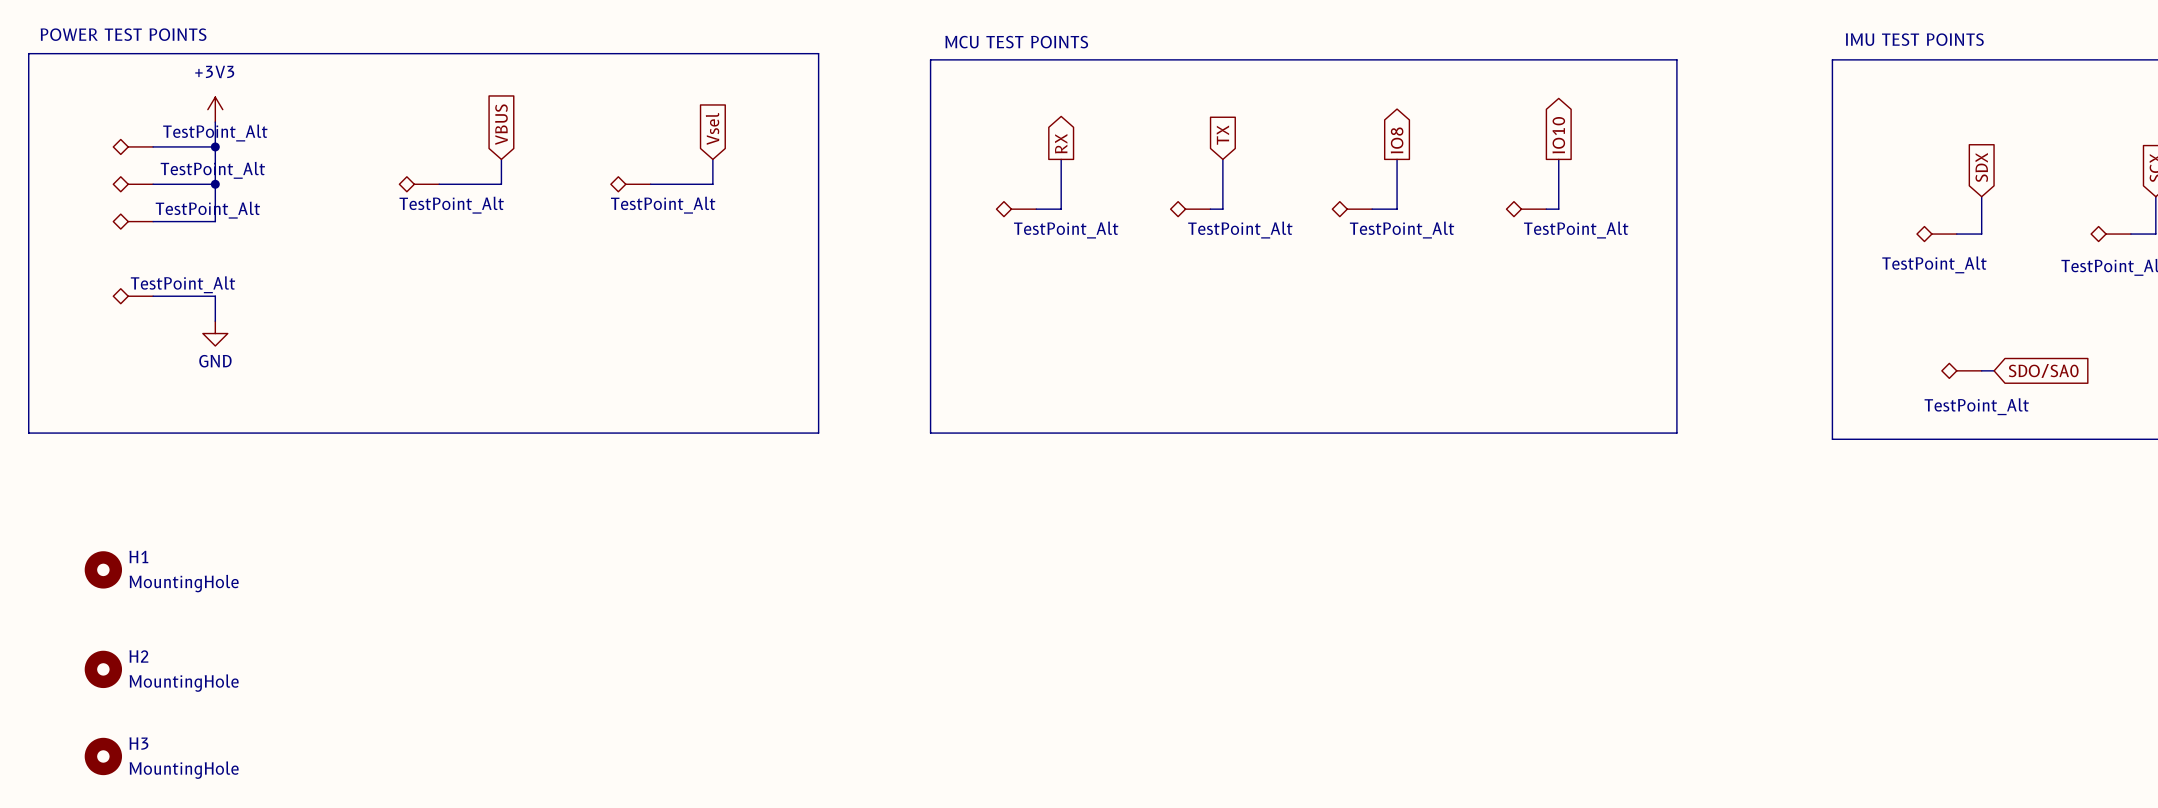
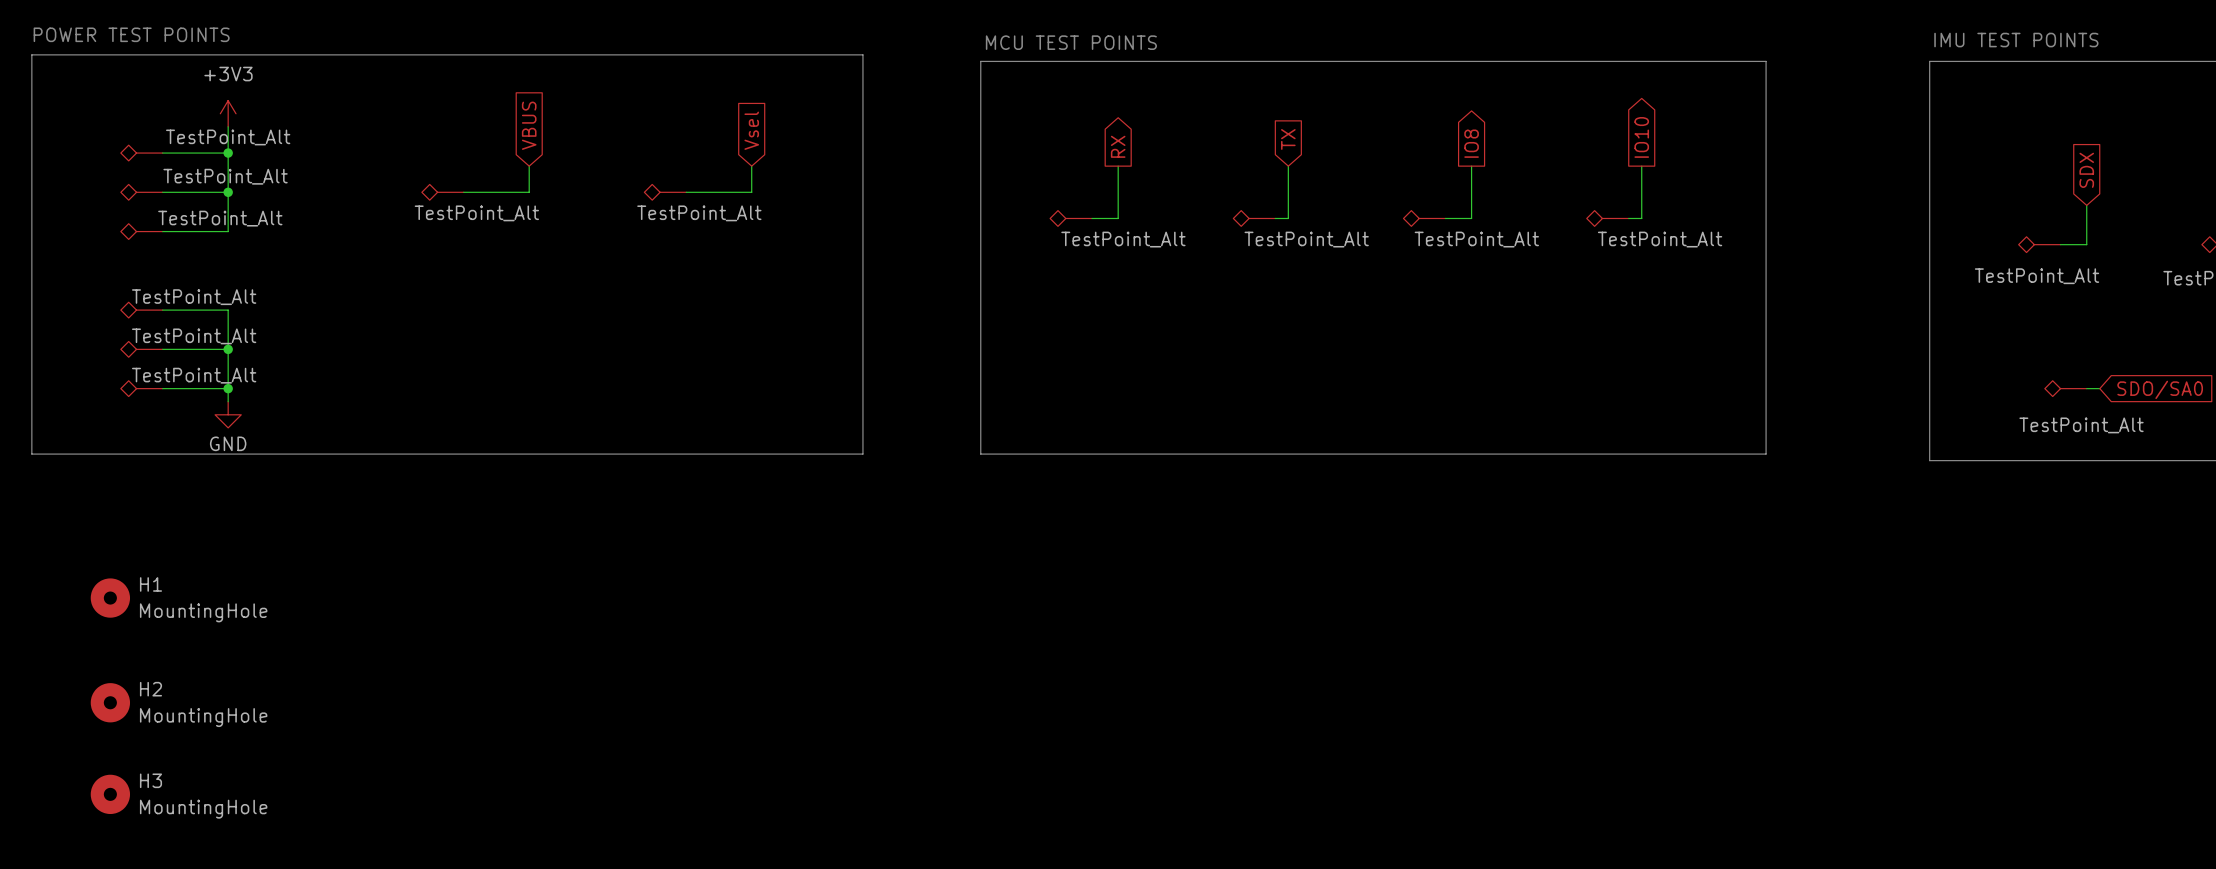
wire: none -> (228, 336) (228, 401)
part: none -> TestPoint_Alt (141, 349)
wire: none -> (162, 349) (228, 349)
power symbol position: GND (215, 333) -> GND (228, 414)
junction: none -> (228, 349)
part: none -> TestPoint_Alt (141, 388)
wire: none -> (162, 388) (228, 388)
junction: none -> (228, 388)

